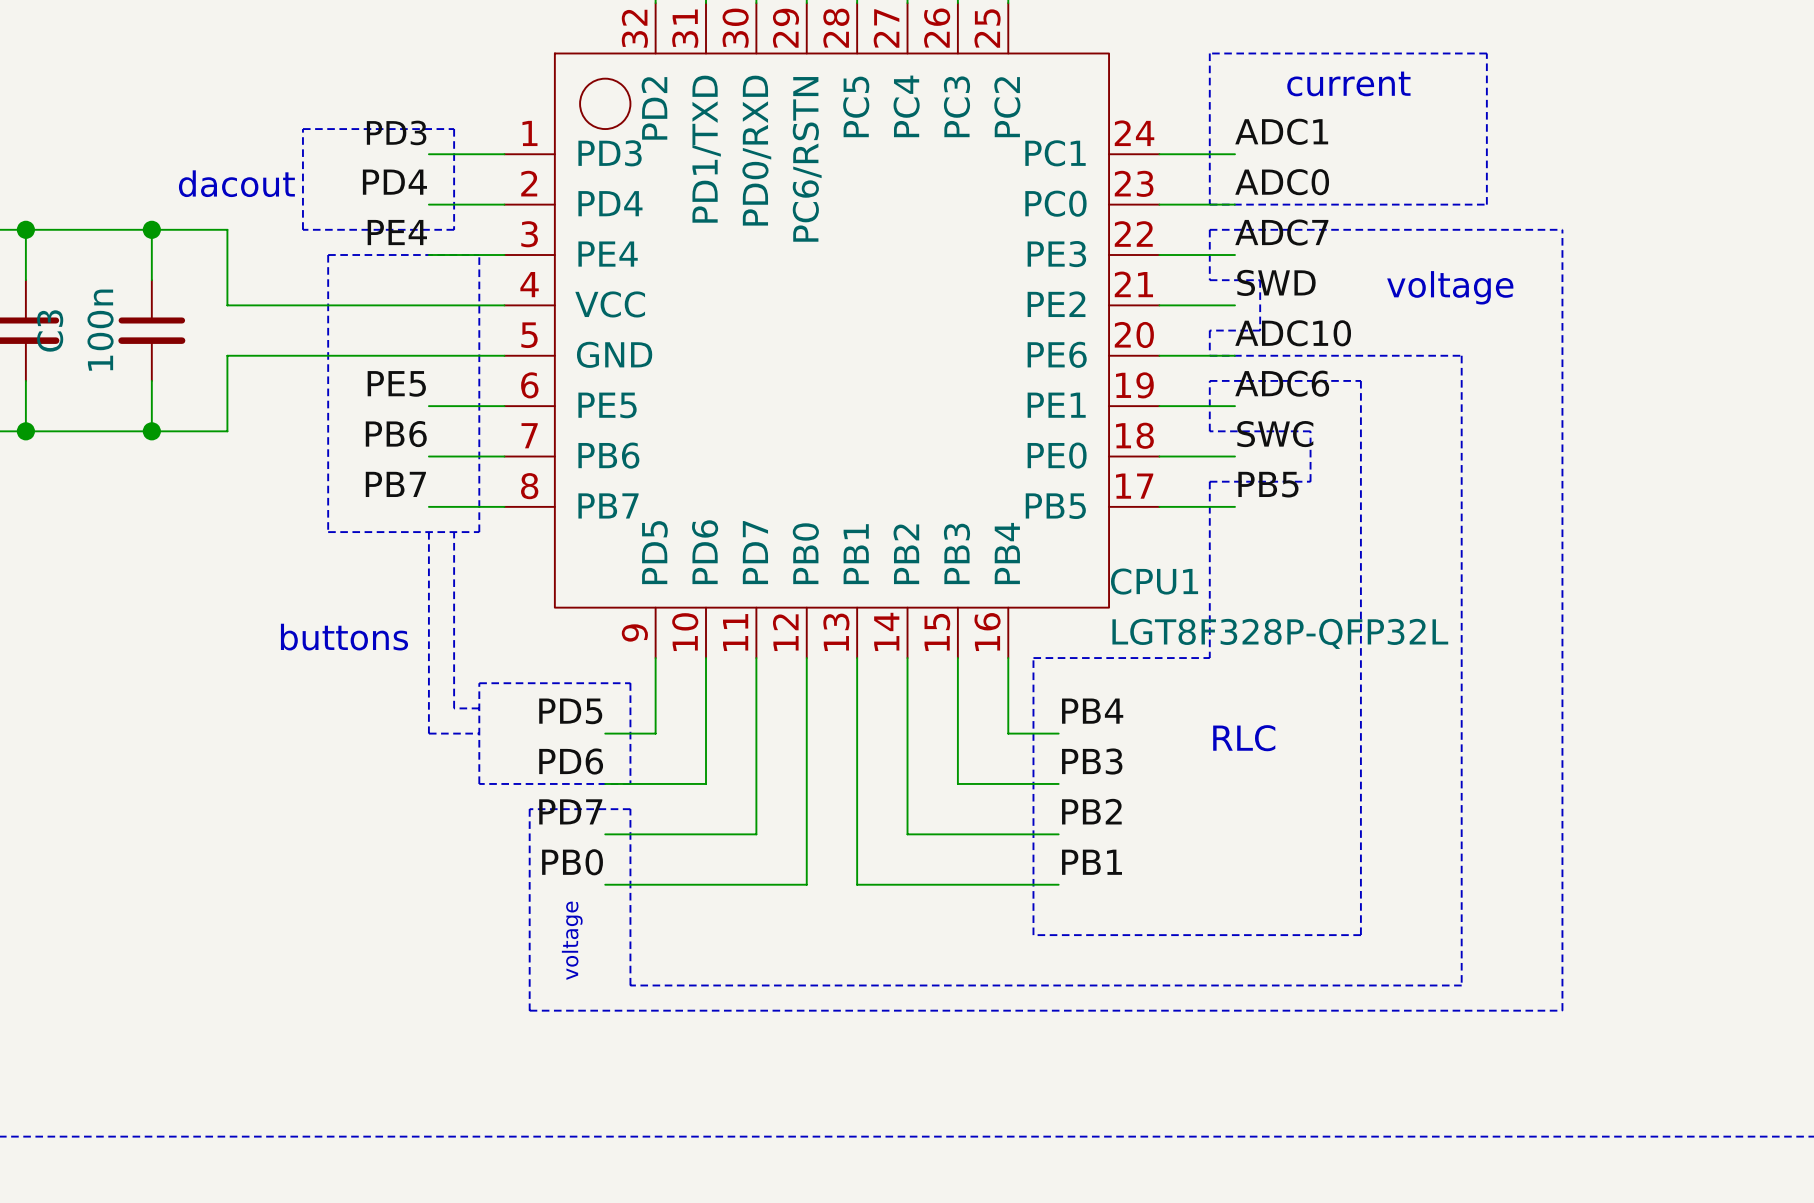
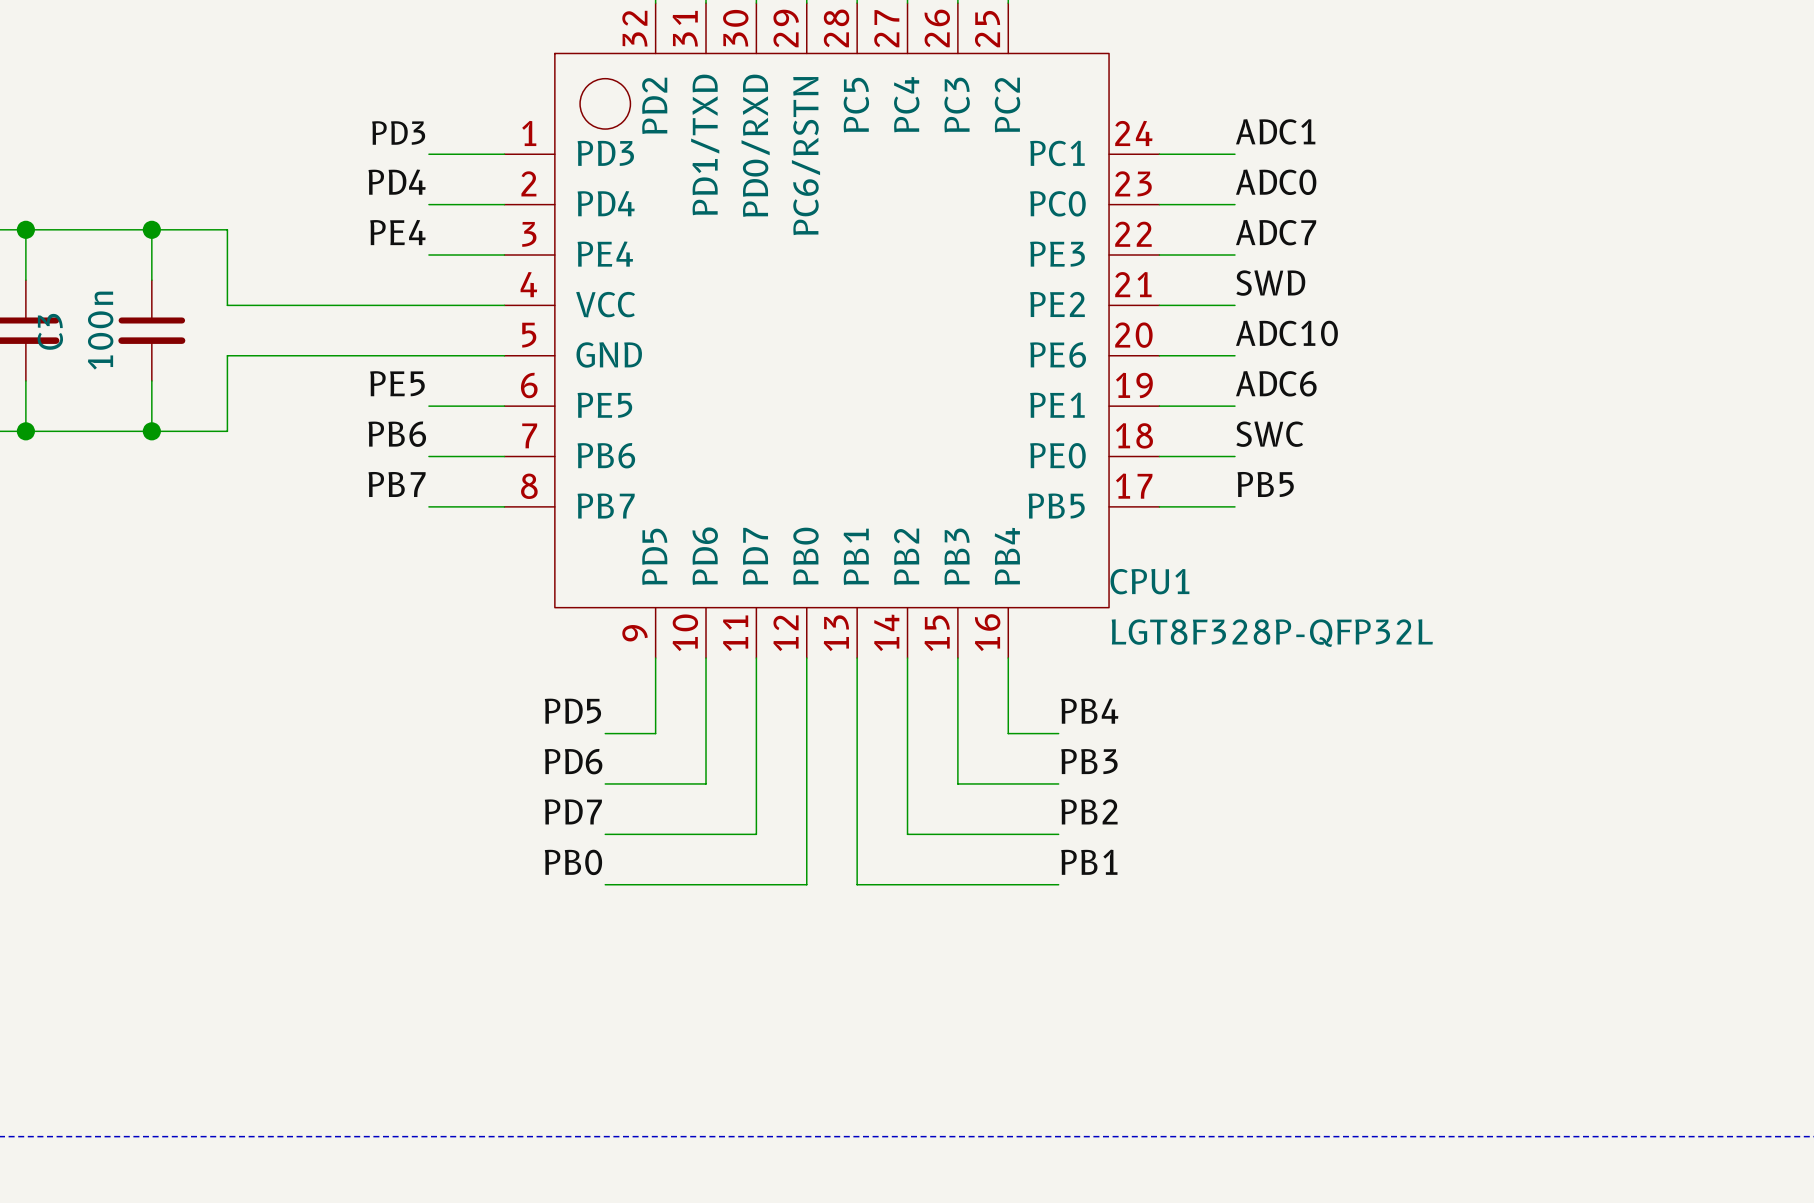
line: (1209, 53) (1209, 204) (1486, 204) (1486, 53) (1209, 53) -> none
text: current (1348, 83) -> none
line: (302, 129) (302, 229) (454, 229) (454, 129) (302, 129) -> none
text: dacout (236, 183) -> none
line: (1209, 229) (1562, 229) (1562, 1010) (529, 1010) (529, 809) (630, 809) (630, 985) (1461, 985) (1461, 355) (1209, 355) (1209, 330) (1260, 330) (1260, 280) (1209, 280) (1209, 229) -> none
line: (328, 255) (328, 532) (479, 532) (479, 255) (328, 255) -> none
text: voltage (1450, 287) -> none
line: (1209, 380) (1209, 431) (1310, 431) (1310, 481) (1209, 481) (1209, 658) (1033, 658) (1033, 935) (1360, 935) (1360, 380) (1209, 380) -> none
line: (428, 532) (428, 733) (479, 733) -> none
line: (454, 532) (454, 708) (479, 708) -> none
text: buttons (344, 637) -> none
line: (479, 683) (479, 783) (630, 783) (630, 683) (479, 683) -> none
text: RLC (1244, 738) -> none
text: voltage (572, 940) -> none

